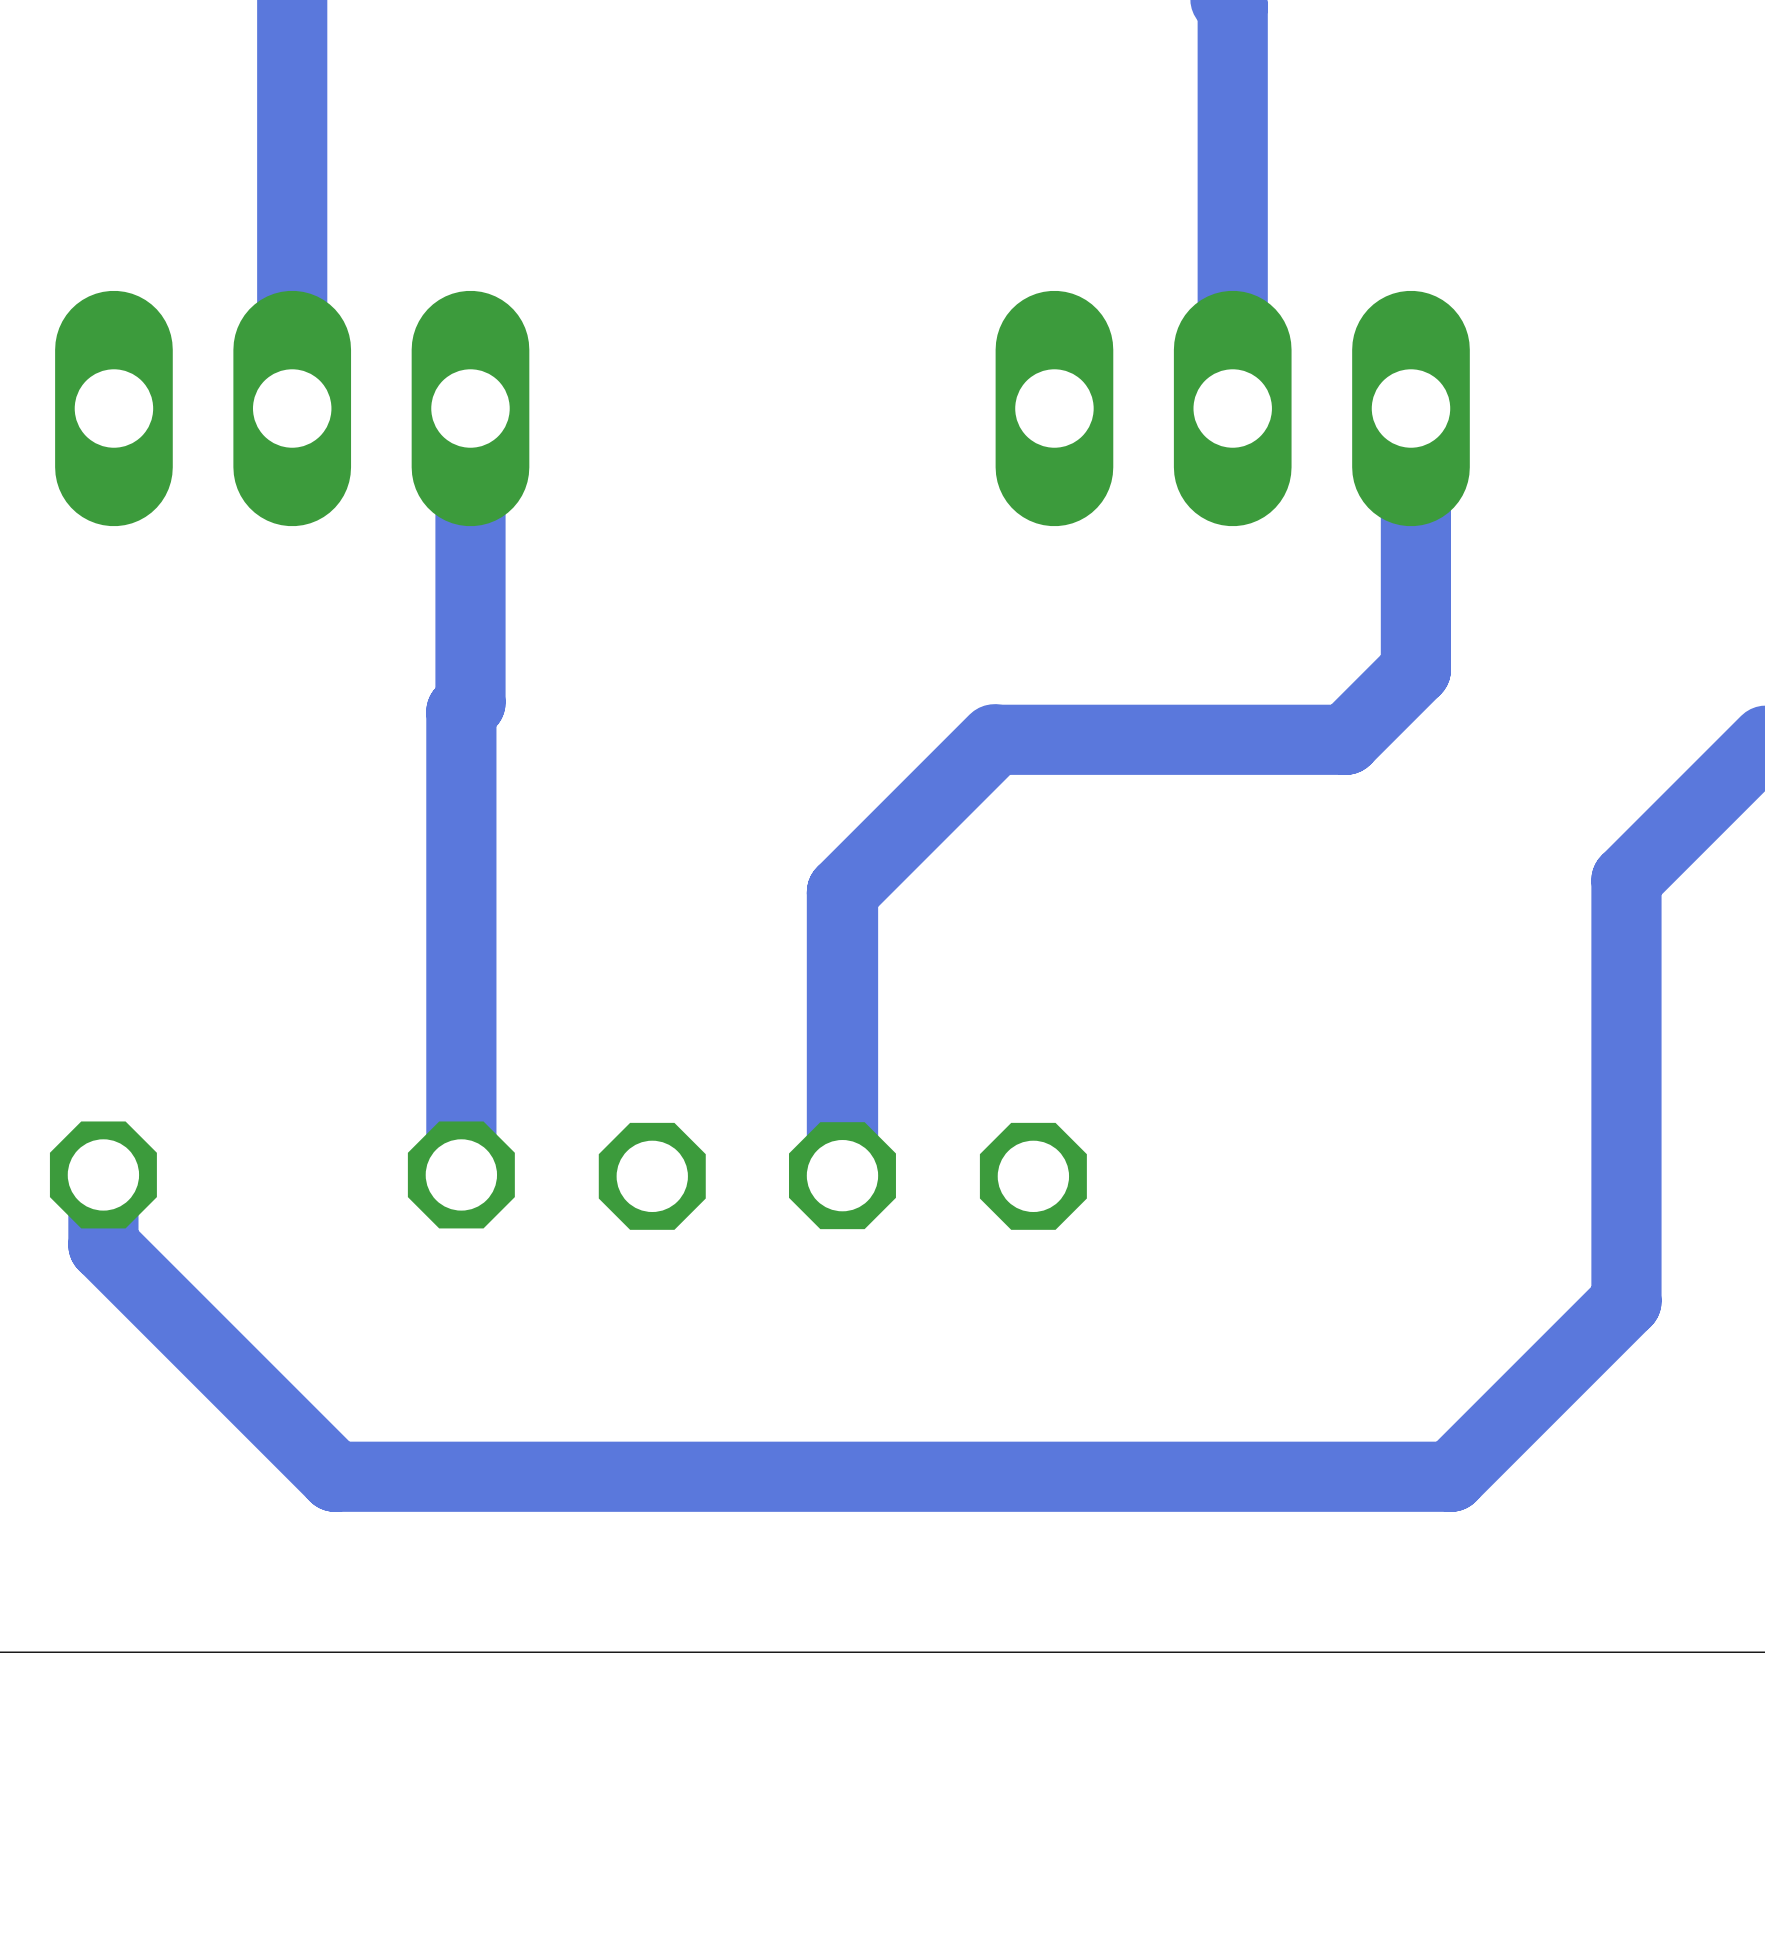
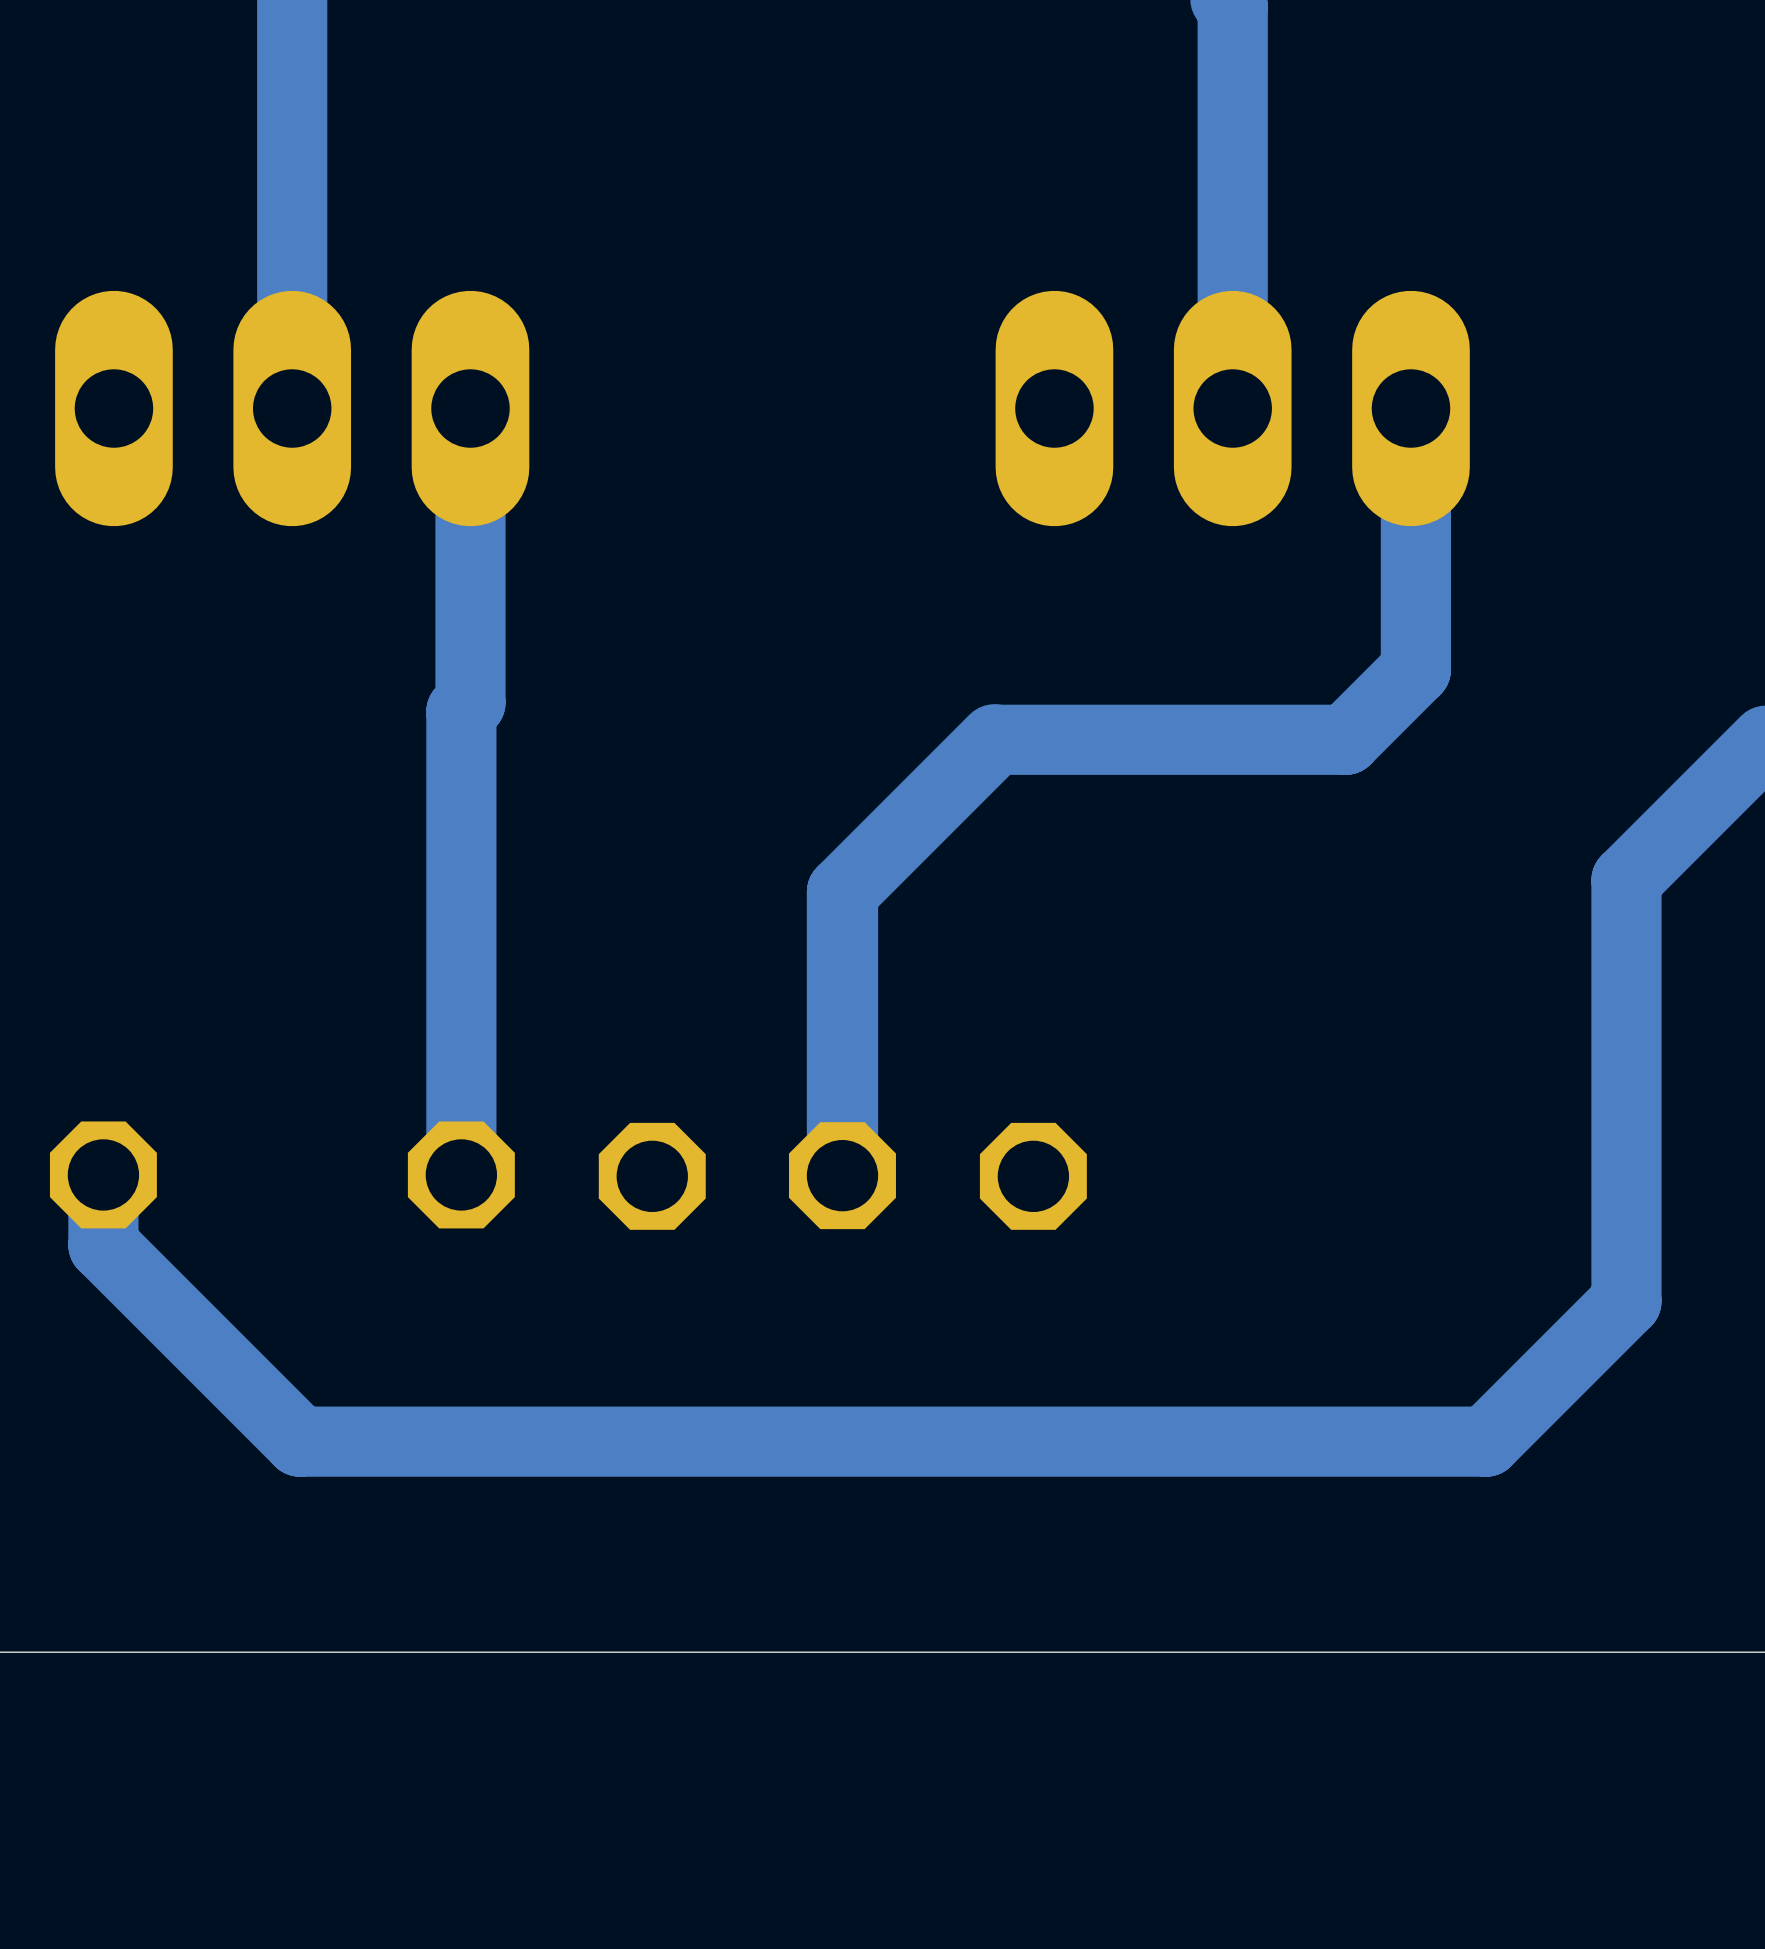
track: (1486, 1441) (1451, 1476) (335, 1476) (299, 1441) -> (1486, 1441) (299, 1441)

